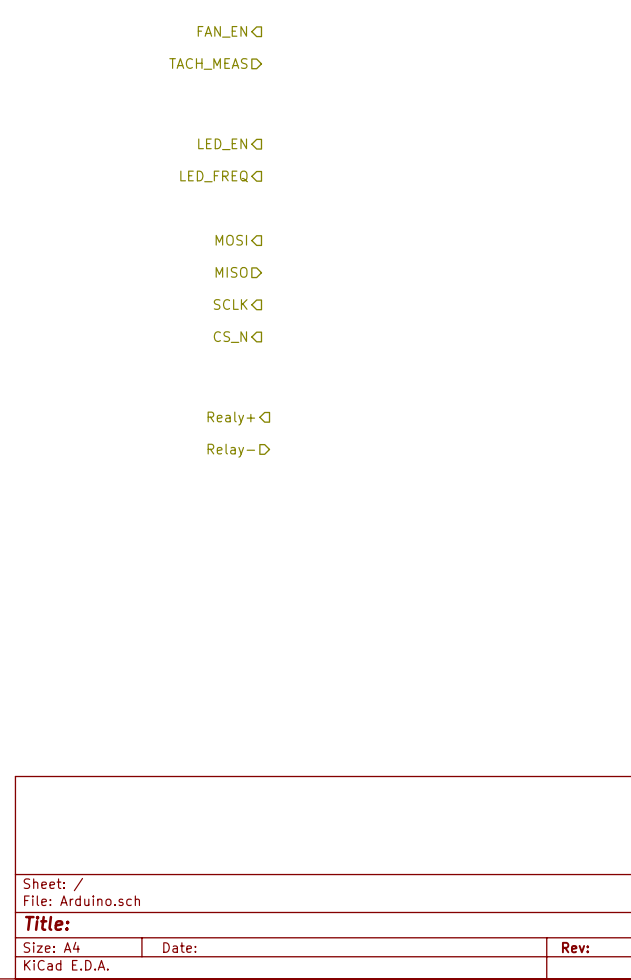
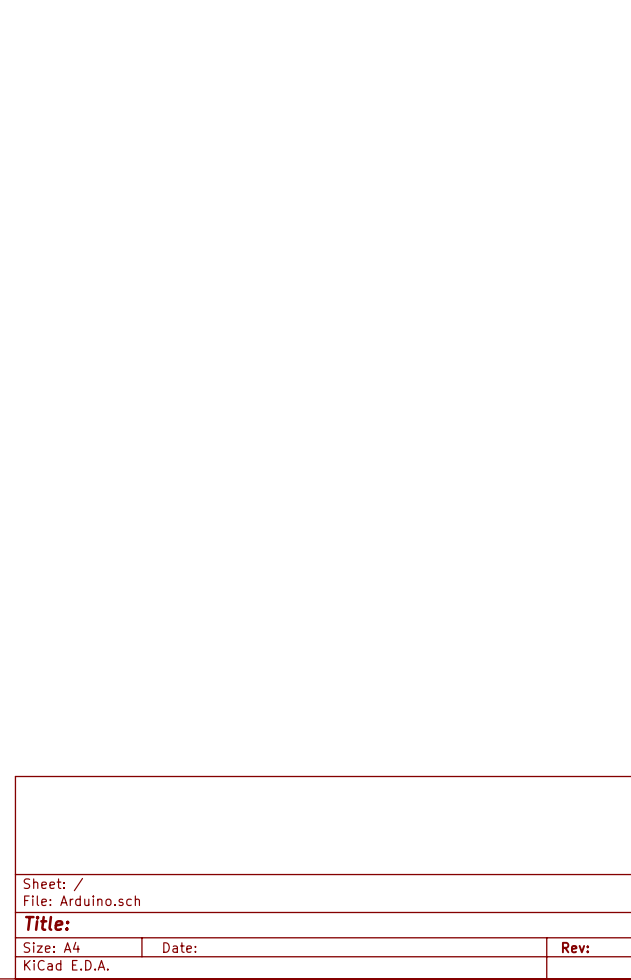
hierarchical label: FAN_EN (222, 31) -> none
hierarchical label: TACH_MEAS (208, 63) -> none
hierarchical label: LED_EN (222, 144) -> none
hierarchical label: LED_FREQ (214, 176) -> none
hierarchical label: MOSI (231, 240) -> none
hierarchical label: MISO (231, 272) -> none
hierarchical label: SCLK (230, 304) -> none
hierarchical label: CS_N (230, 337) -> none
hierarchical label: Realy+ (231, 418) -> none
hierarchical label: Relay- (231, 450) -> none

